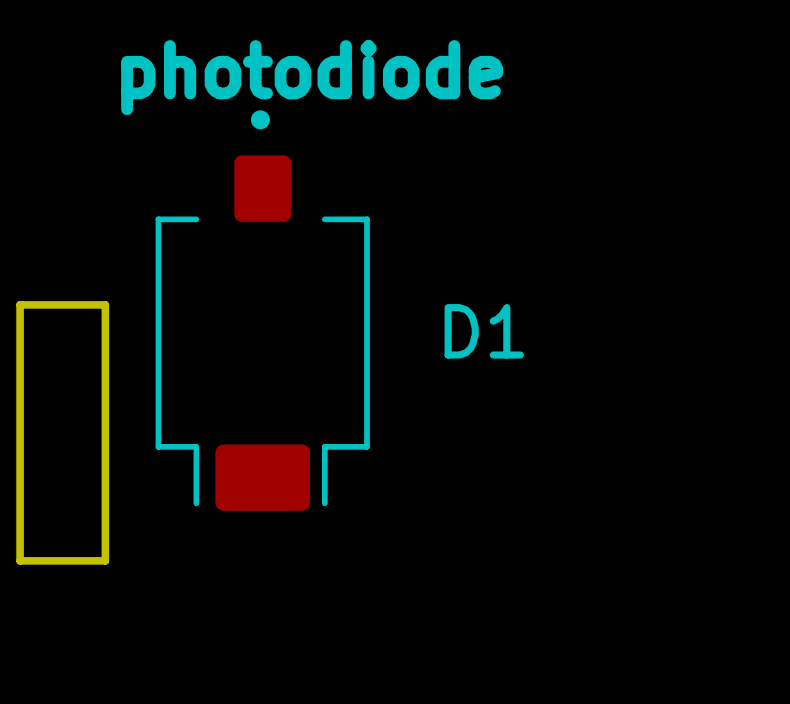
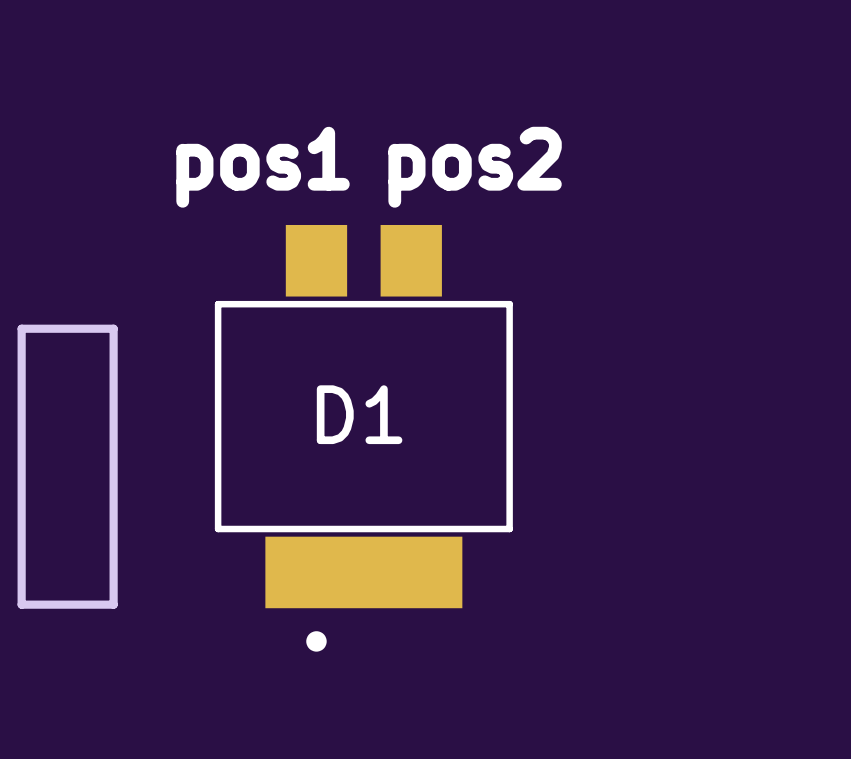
text: photodiode (312, 77) -> none
D1 footprint: [155, 110, 370, 511] -> [214, 224, 513, 652]
text: none -> pos1 (263, 167)
text: none -> pos2 (475, 167)
D1 name position: D1 (484, 331) -> D1 (359, 414)

